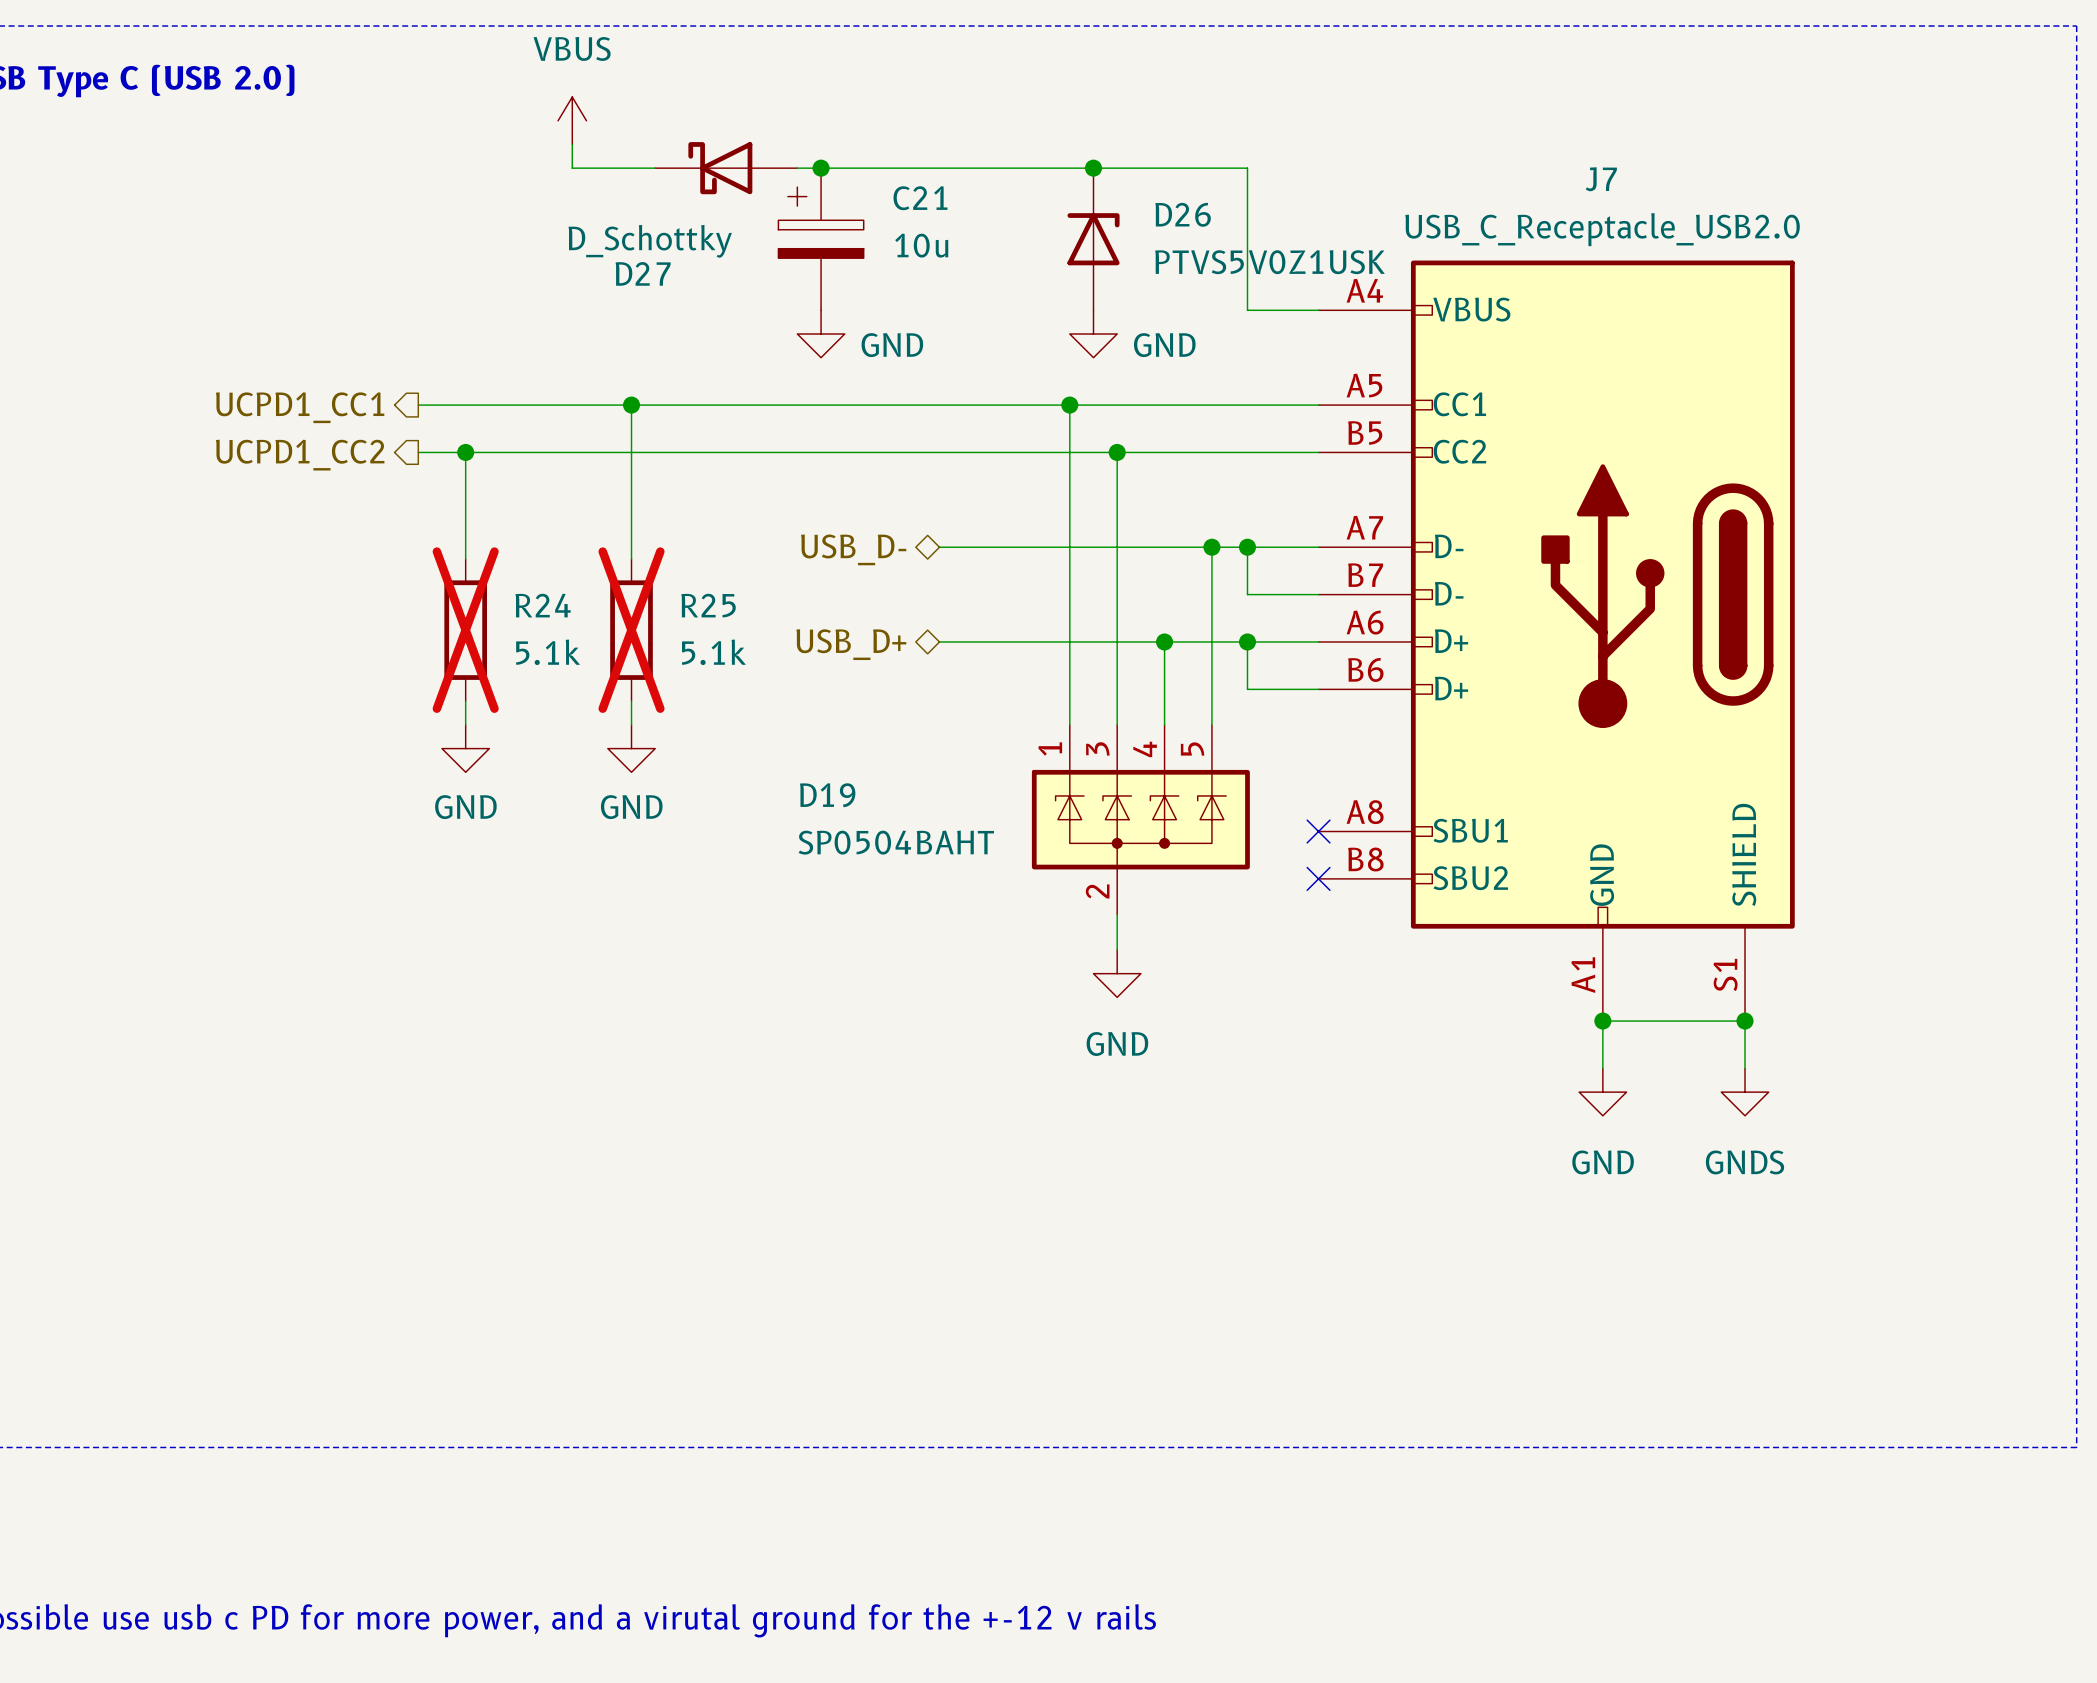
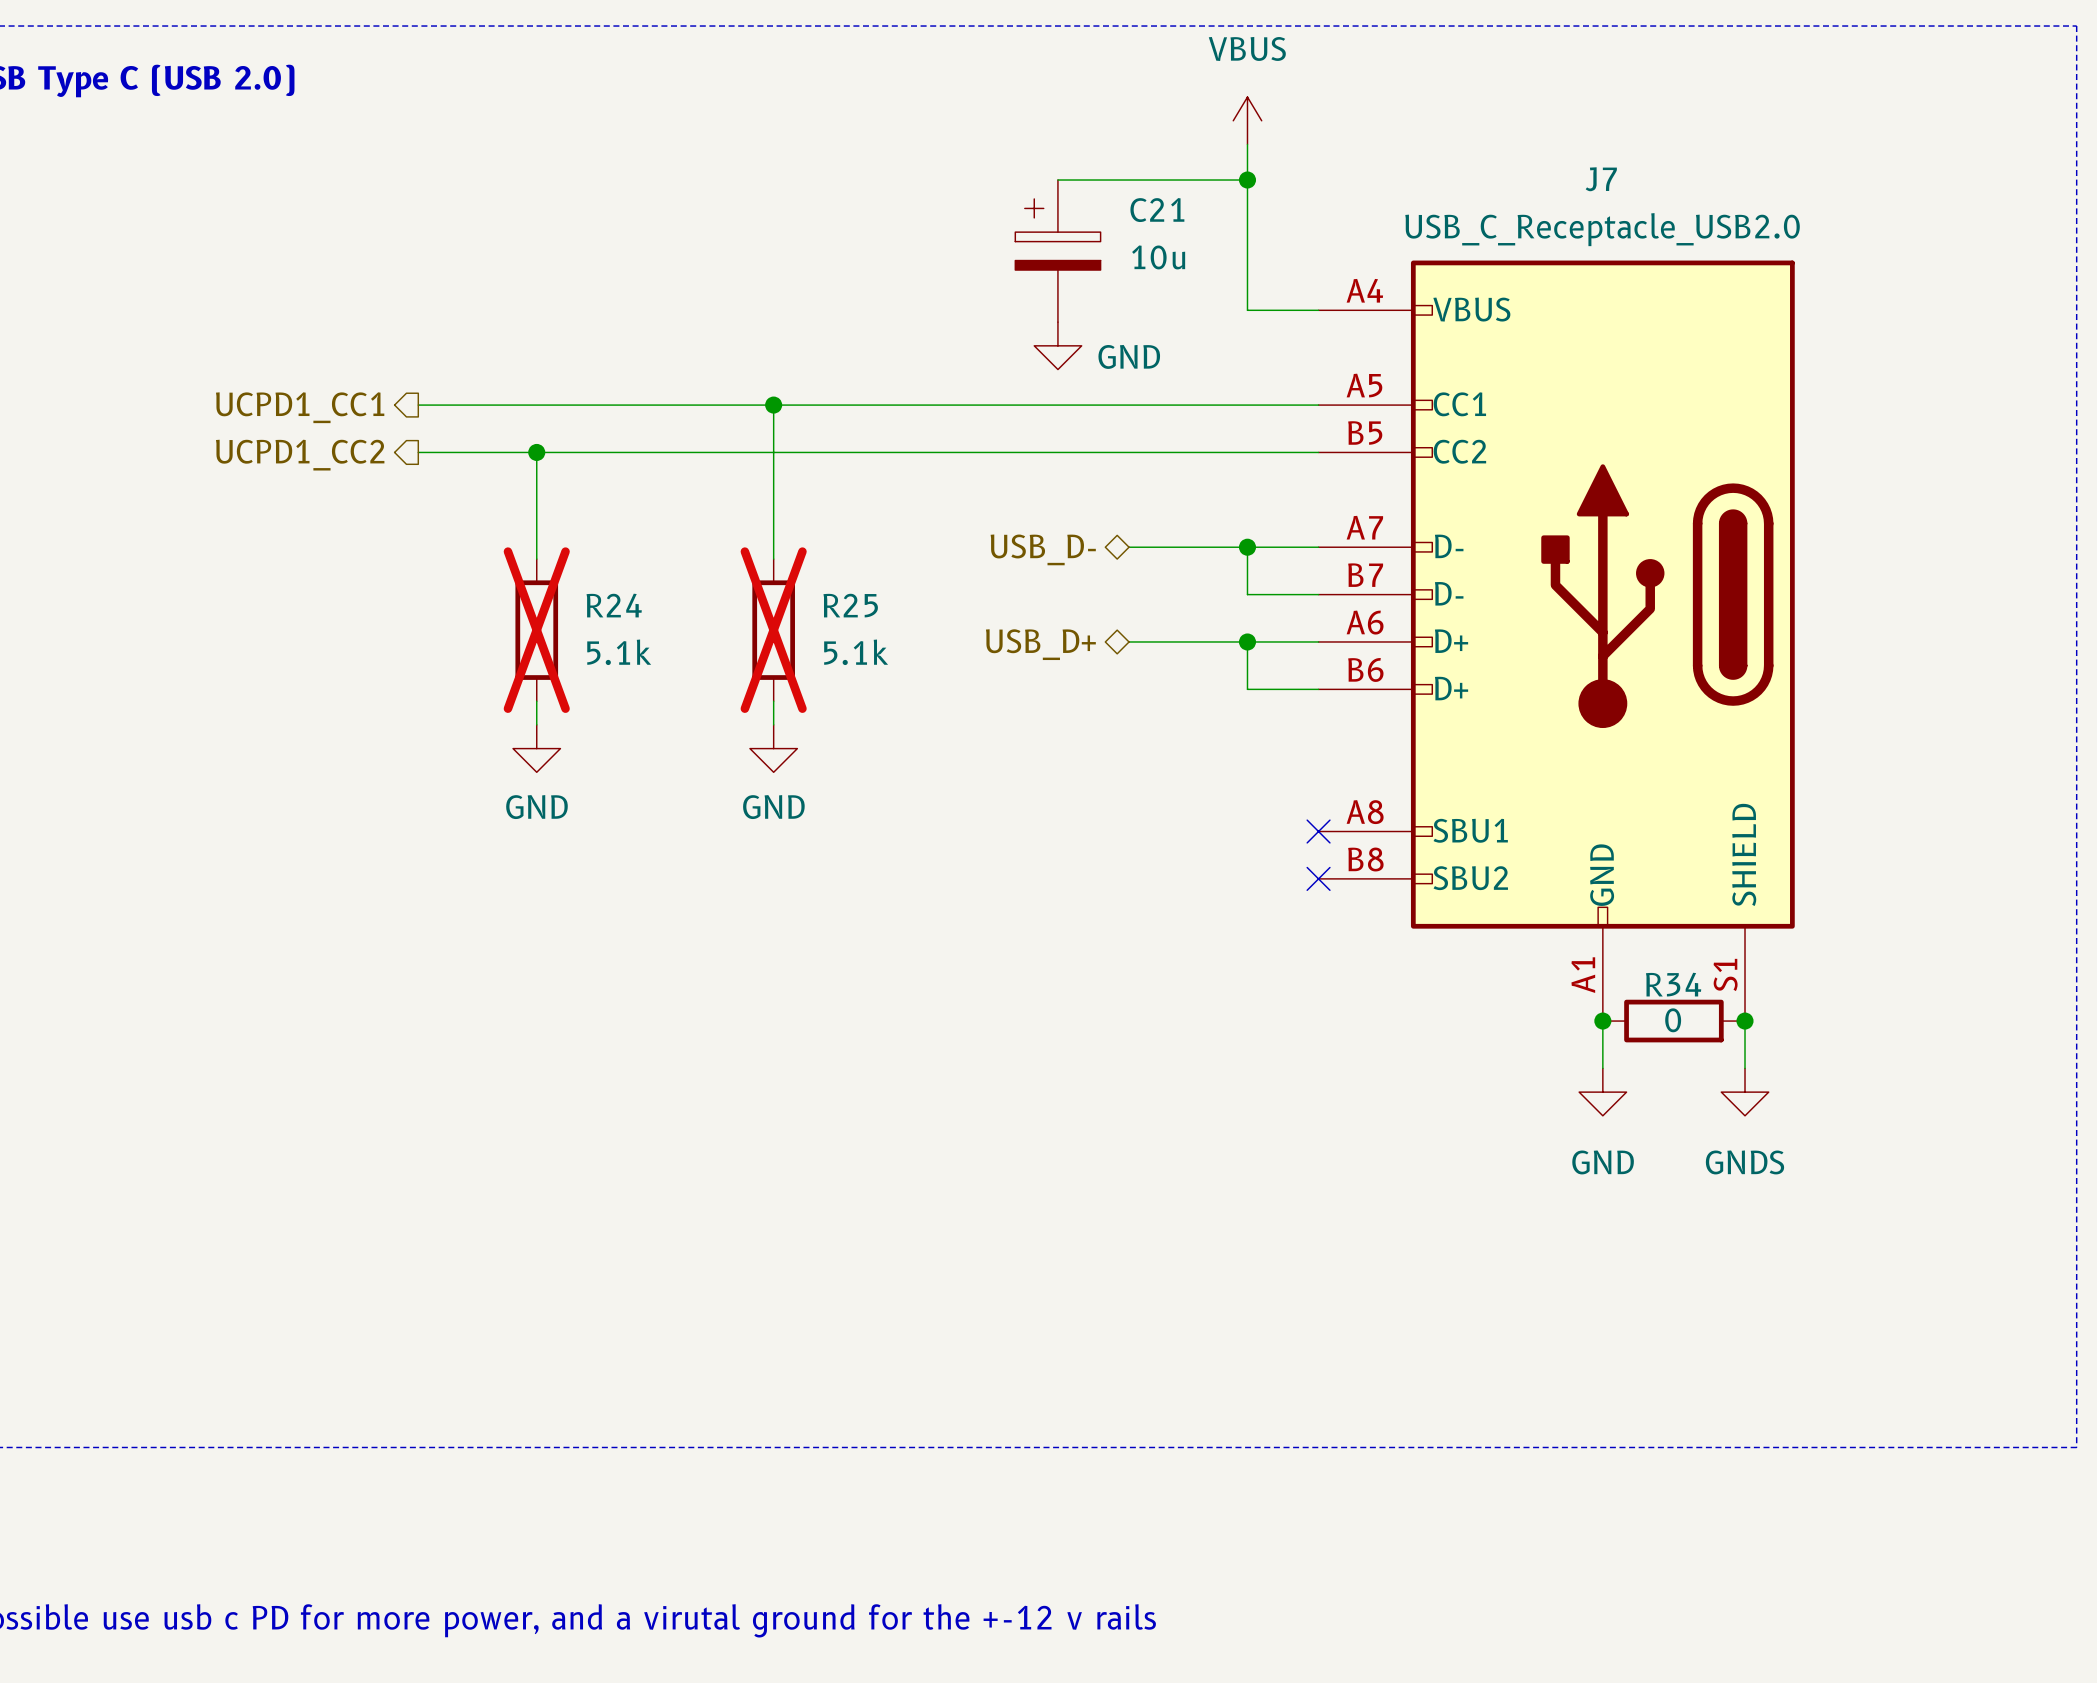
power symbol: VBUS (572, 120) -> none
power symbol: none -> VBUS (1247, 120)
wire: (572, 144) (572, 168) (655, 168) -> none
D27: D_Schottky (726, 168) -> none
wire: (797, 168) (1247, 168) -> (1247, 144) (1247, 168)
junction: (821, 168) -> none
junction: (1093, 168) -> none
junction: none -> (1247, 180)
C21 position: (821, 239) -> (1057, 251)
D26: PTVS5V0Z1USK (1093, 239) -> none
power symbol: GND (821, 334) -> none
power symbol position: GND (1093, 334) -> GND (1057, 345)
wire: (631, 405) (631, 559) -> (773, 405) (773, 559)
junction: (631, 405) -> none
junction: none -> (773, 405)
wire: (1069, 405) (1069, 724) -> none
junction: (1069, 405) -> none
wire: (465, 452) (465, 559) -> (536, 452) (536, 559)
junction: (465, 452) -> none
junction: none -> (536, 452)
wire: (1117, 452) (1117, 724) -> none
junction: (1117, 452) -> none
wire: (939, 547) (1129, 547) -> (1057, 180) (1247, 180)
wire: (1211, 547) (1211, 724) -> none
junction: (1211, 547) -> none
hierarchical label position: USB_D- (853, 549) -> USB_D- (1043, 549)
R24 position: (465, 630) -> (536, 630)
R25 position: (631, 630) -> (773, 630)
wire: (939, 641) (1129, 641) -> none
wire: (1164, 641) (1164, 724) -> none
junction: (1164, 641) -> none
hierarchical label position: USB_D+ (851, 644) -> USB_D+ (1040, 644)
wire: (465, 701) (465, 724) -> (536, 701) (536, 724)
wire: (631, 701) (631, 724) -> (773, 701) (773, 724)
power symbol: GND (465, 748) -> none
power symbol: none -> GND (536, 748)
power symbol: GND (631, 748) -> none
power symbol: none -> GND (773, 748)
D19: SP0504BAHT (1140, 819) -> none
wire: (1117, 914) (1117, 949) -> none
power symbol: GND (1117, 973) -> none
wire: (1602, 1021) (1745, 1021) -> none
R34: none -> 0 (1673, 1021)

